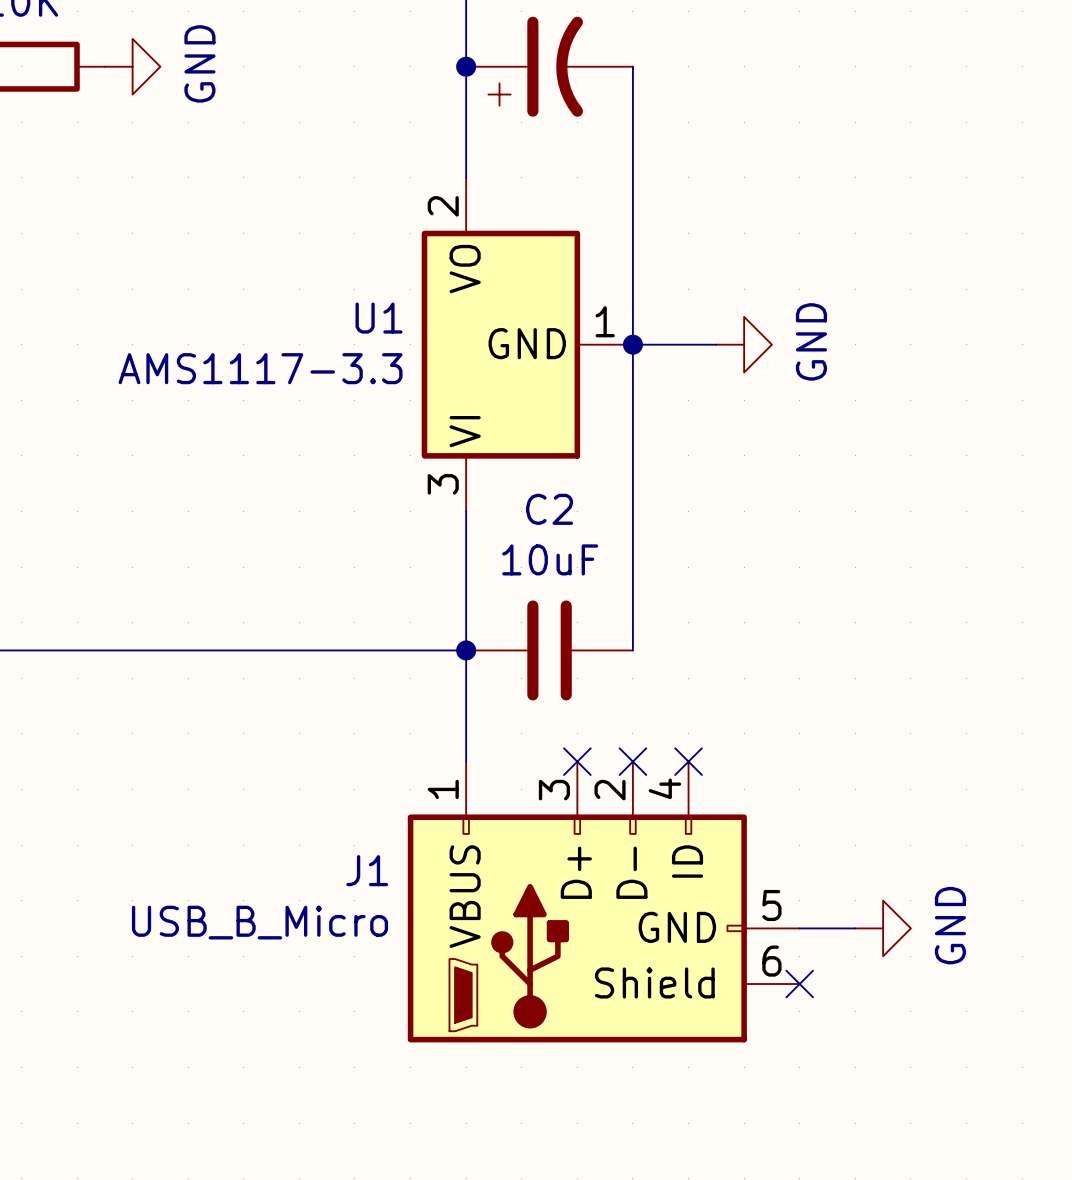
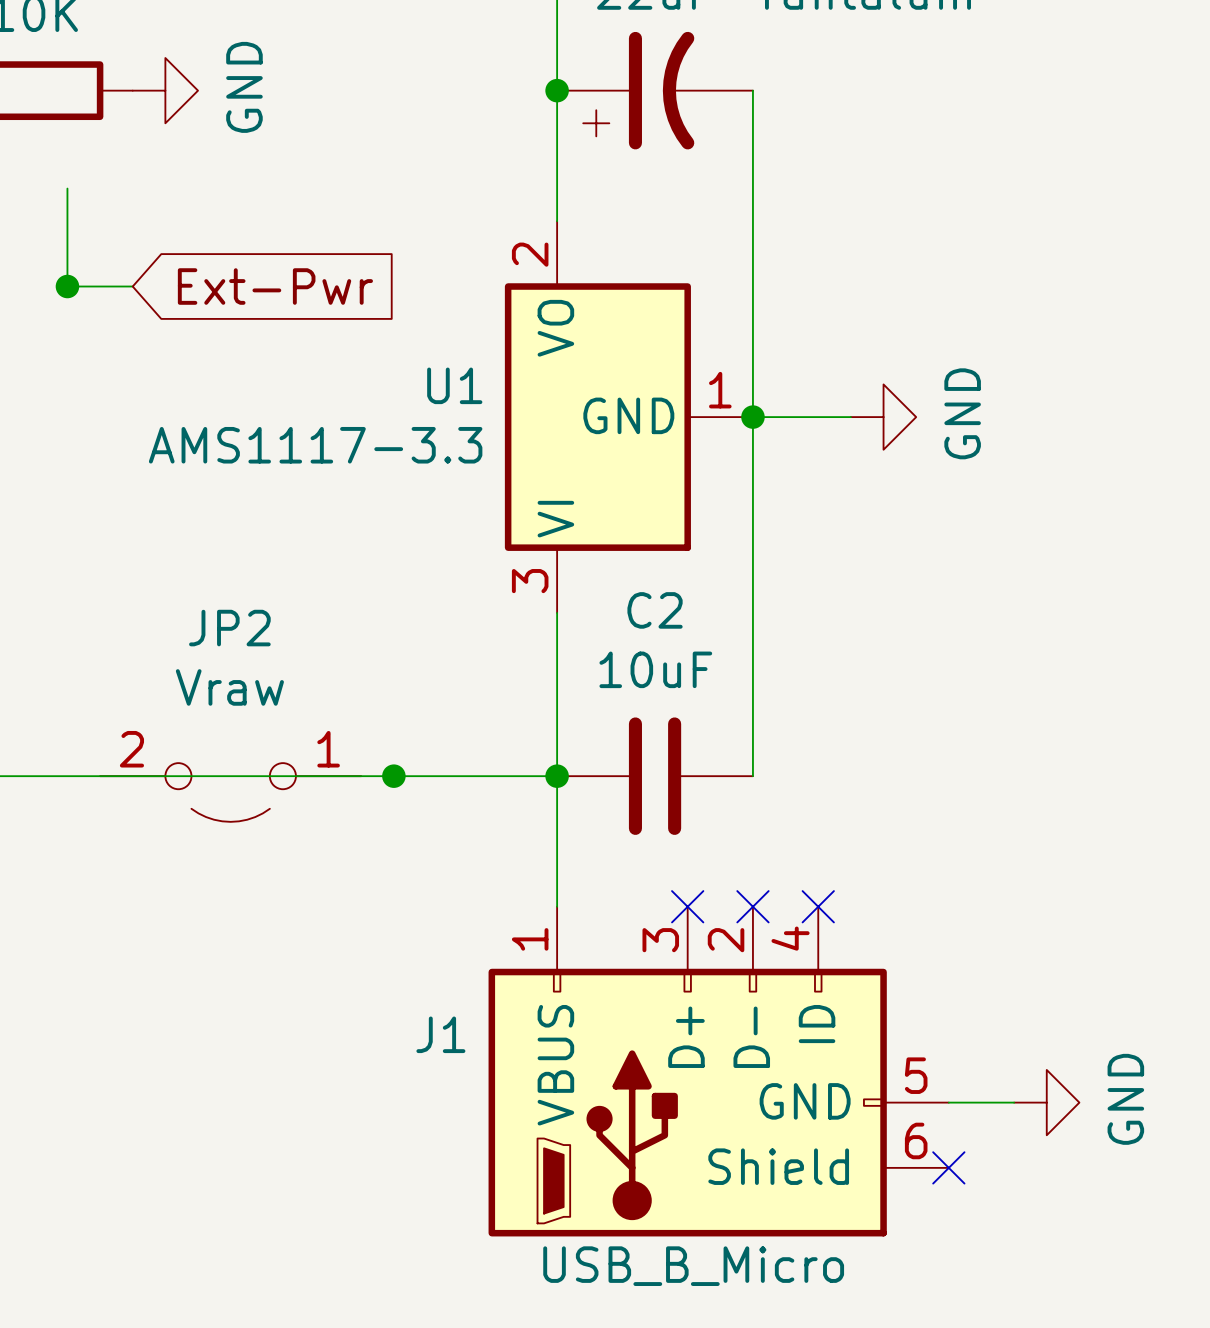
wire: none -> (67, 188) (67, 286) (132, 286)
junction: none -> (67, 286)
global label: none -> Ext-Pwr (275, 286)
junction: none -> (393, 776)
JP2: none -> Vraw (230, 792)
J1 value position: USB_B_Micro (259, 922) -> USB_B_Micro (693, 1266)

